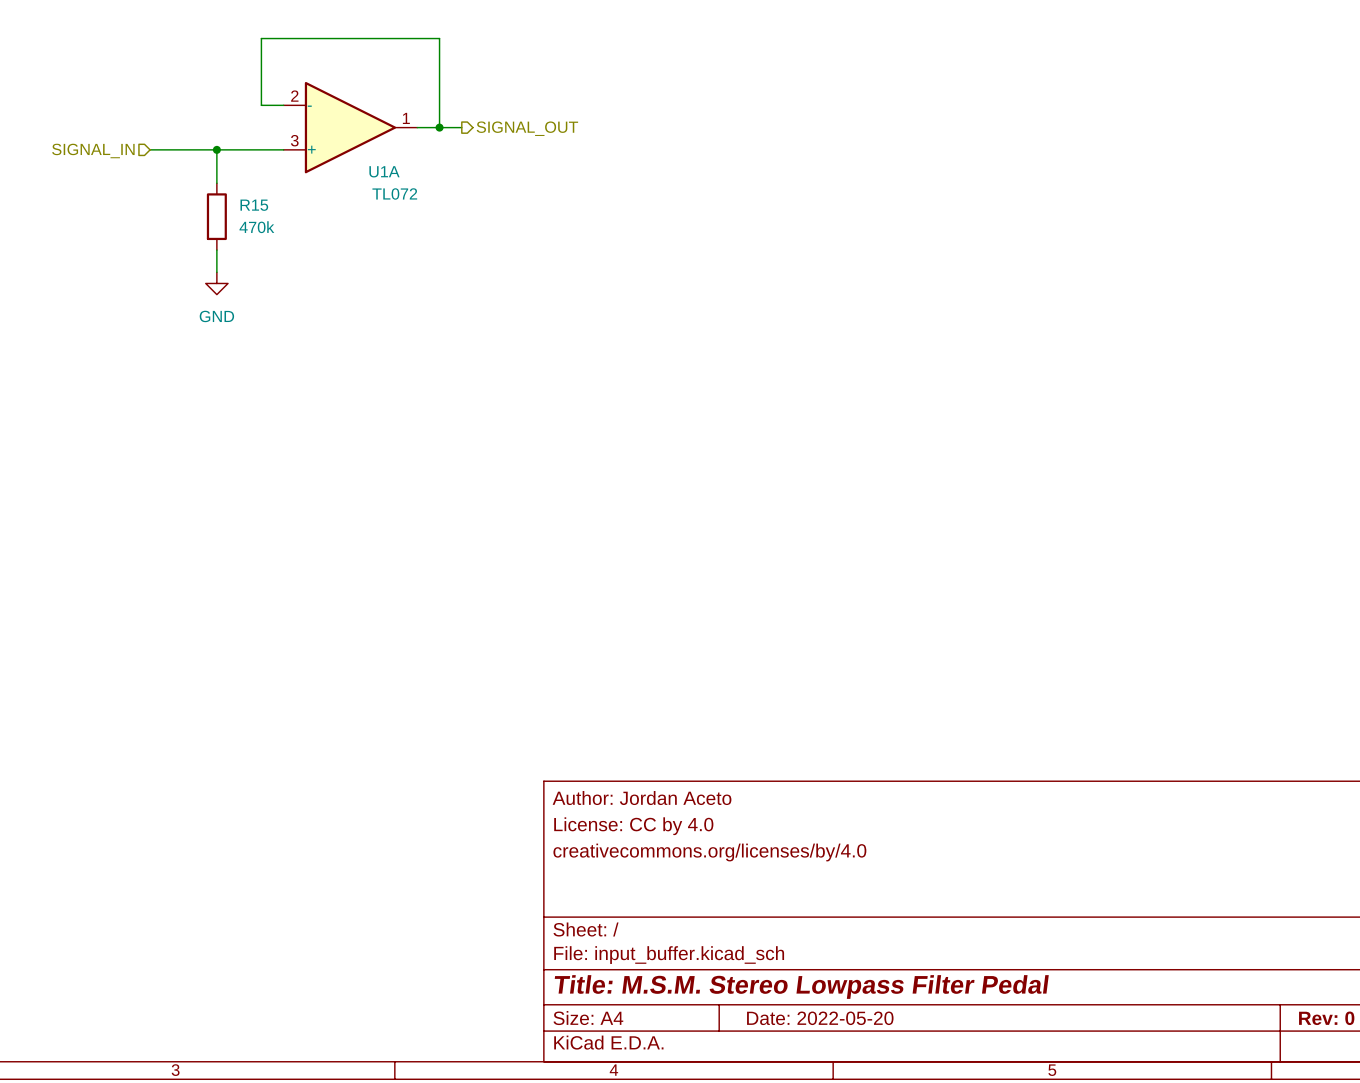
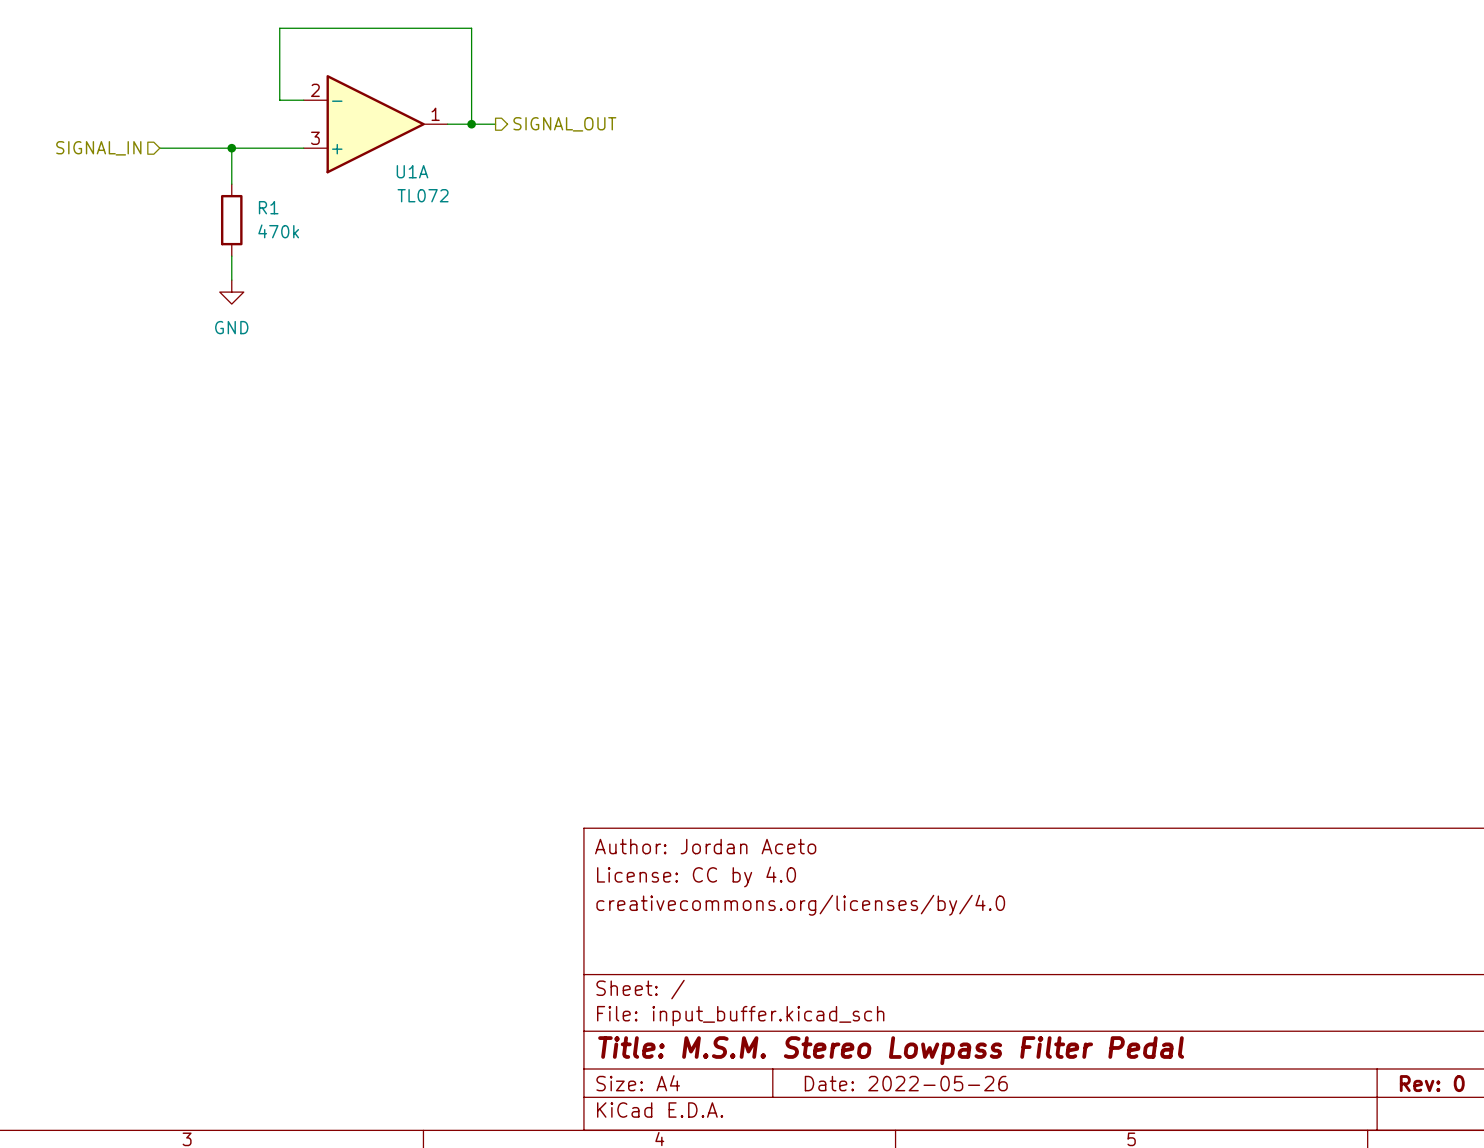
R15 name: R15 (254, 205) -> R1 (268, 207)
title block: Date: 2022-05-20 (820, 1018) -> Date: 2022-05-26 (906, 1083)

